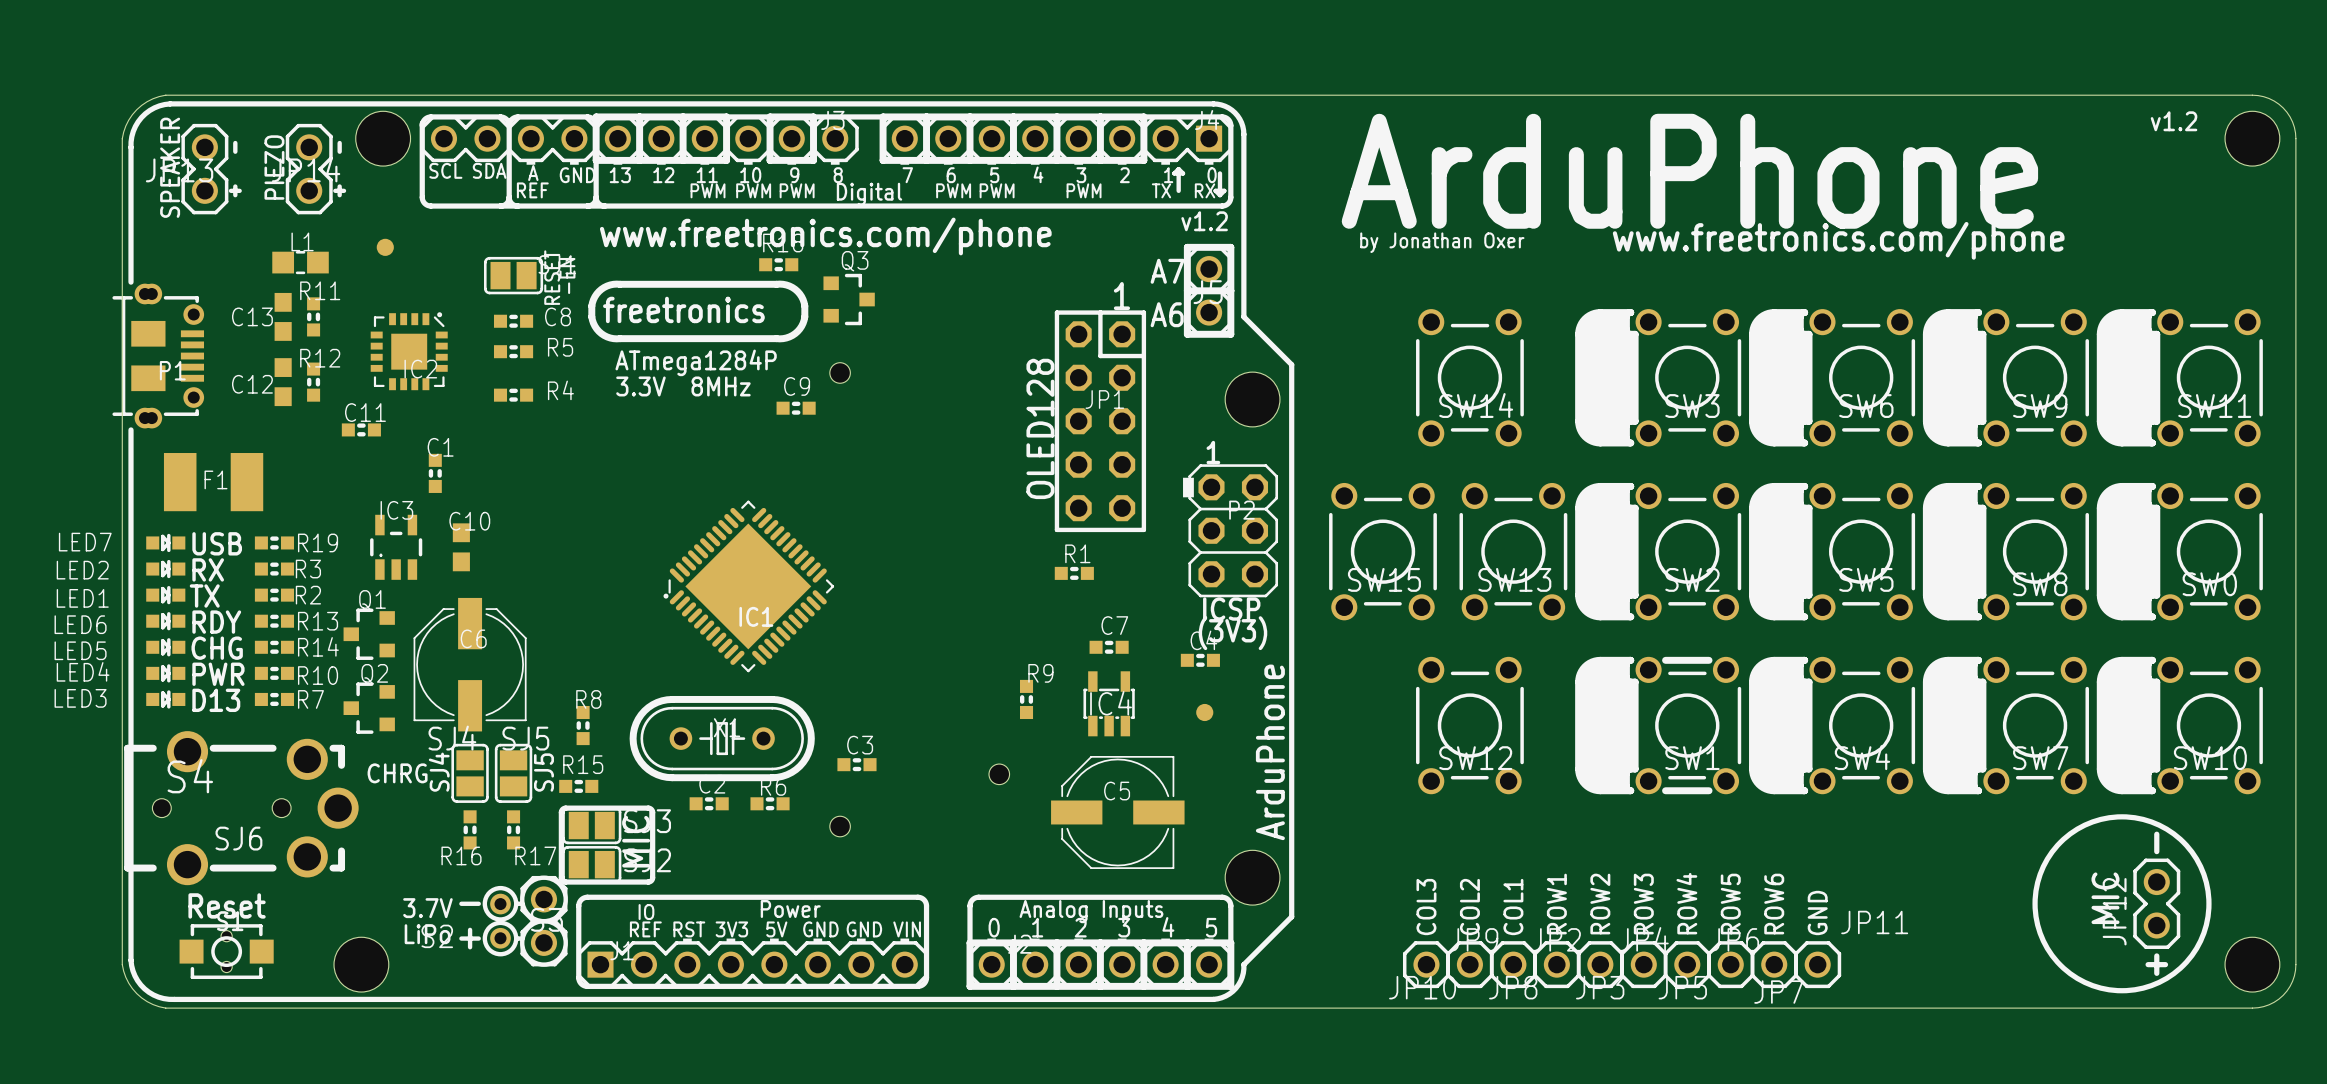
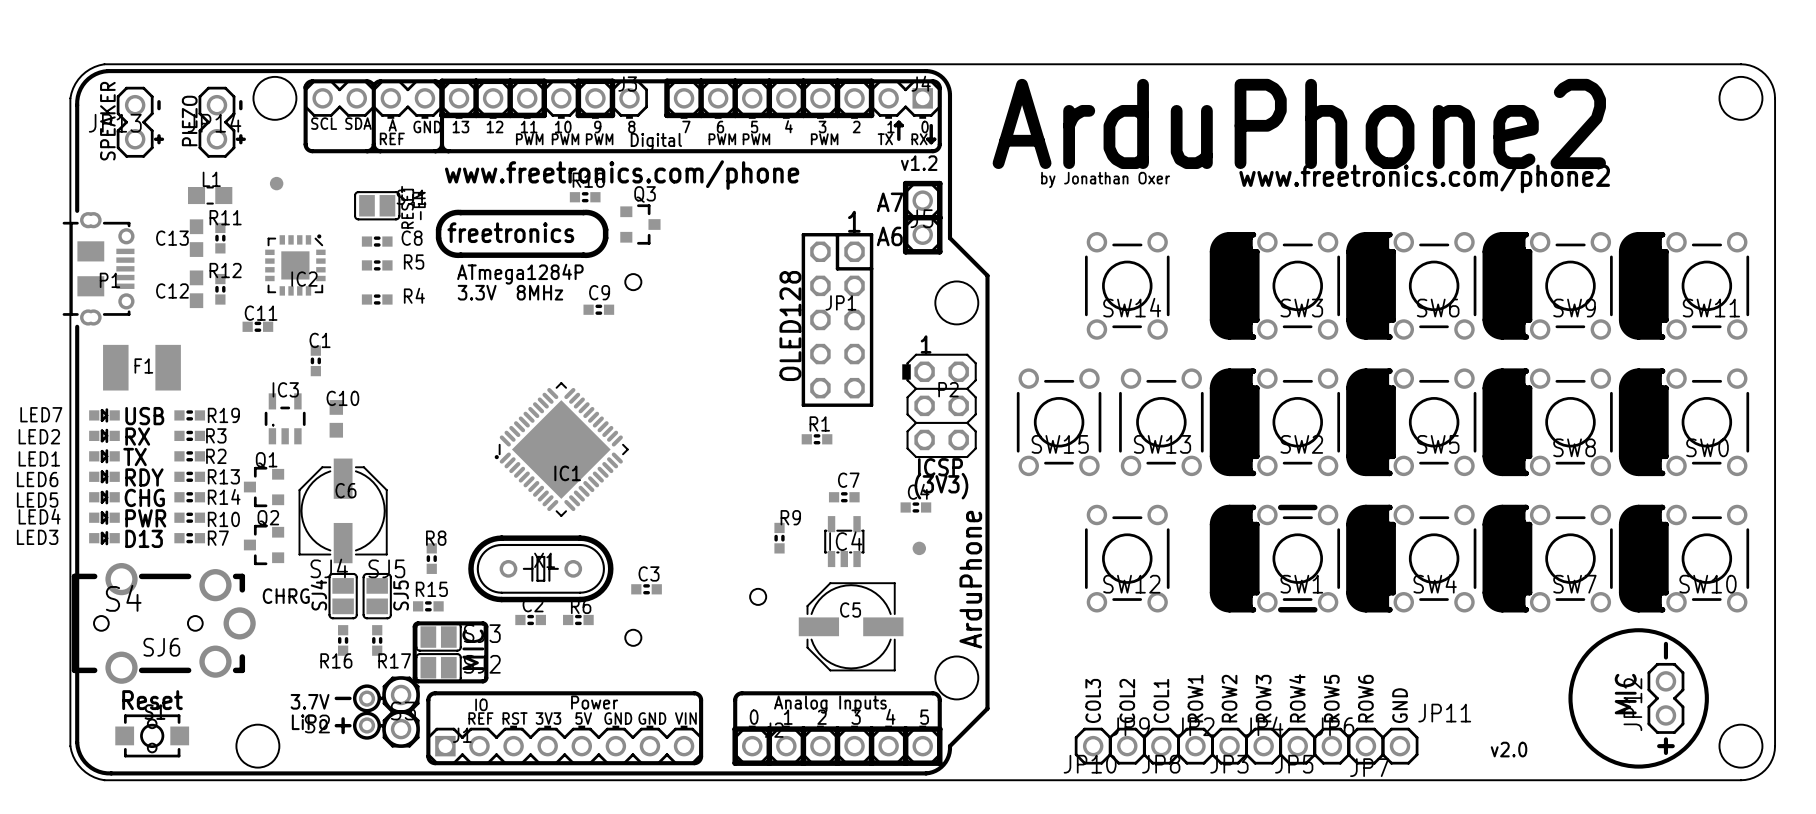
text: v1.2 (2174, 121) -> none
text: ArduPhone (1689, 171) -> ArduPhone2 (1299, 123)
text: www.freetronics.com/phone (1838, 240) -> www.freetronics.com/phone2 (1424, 178)
text: none -> v2.0 (1509, 749)

